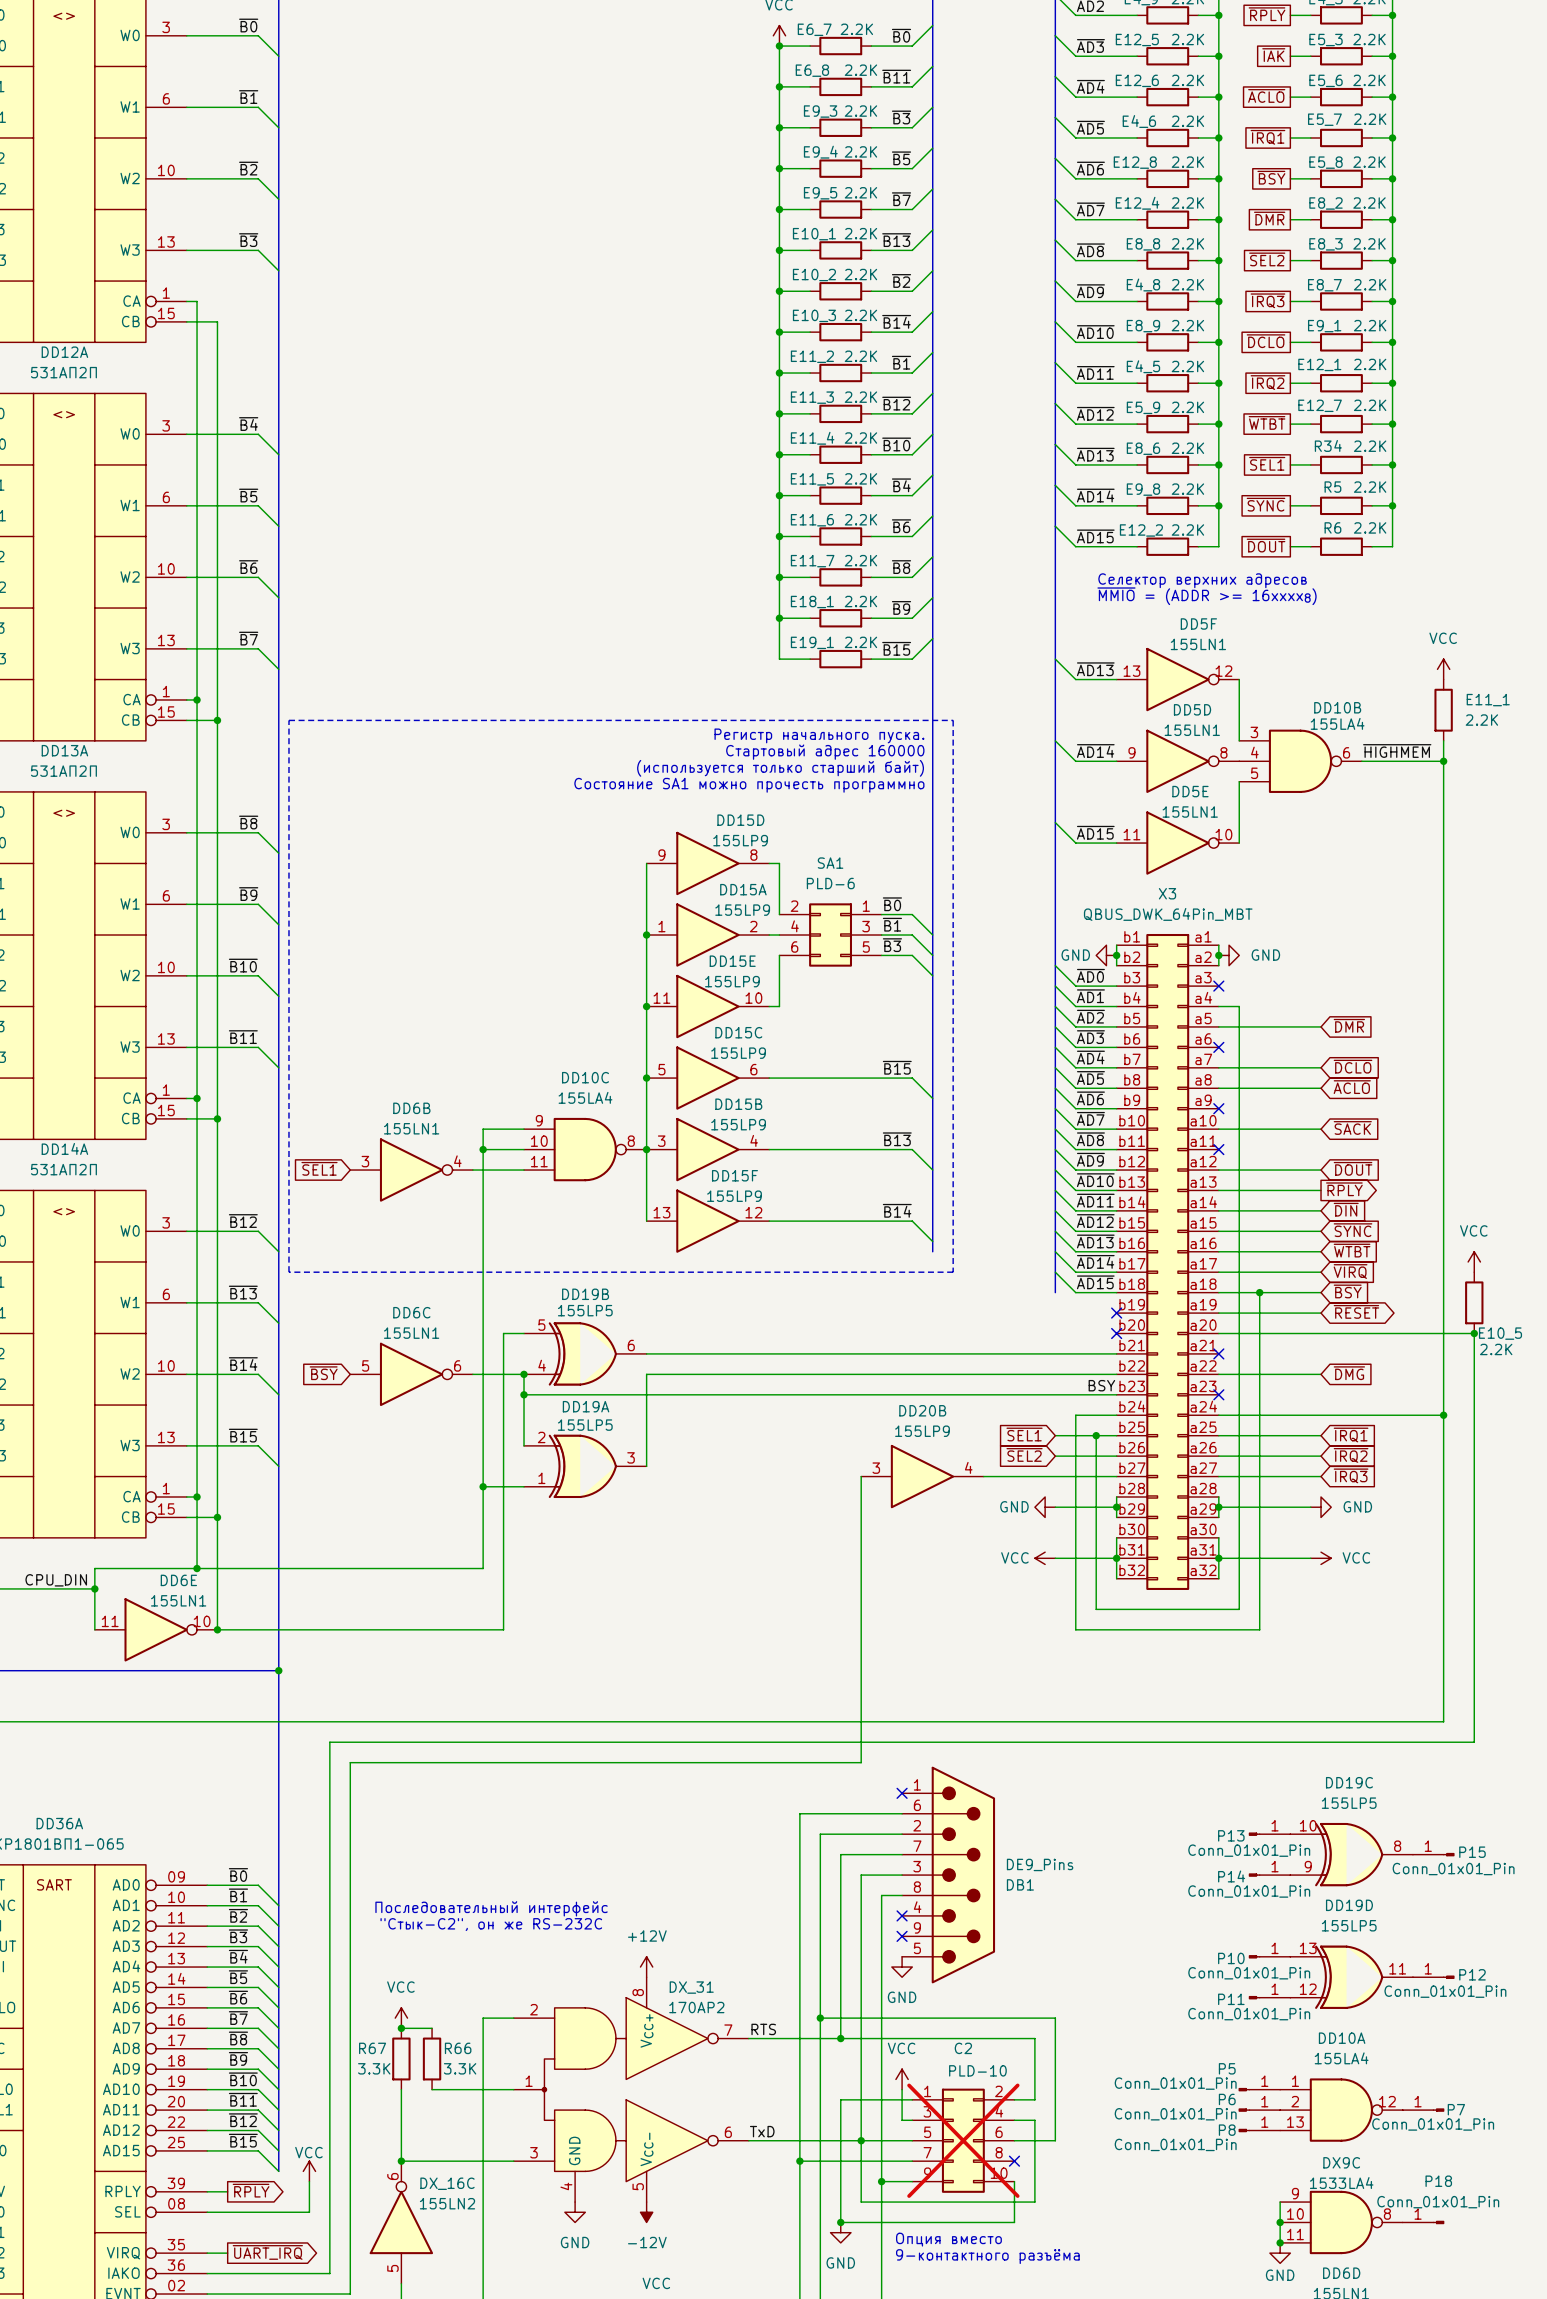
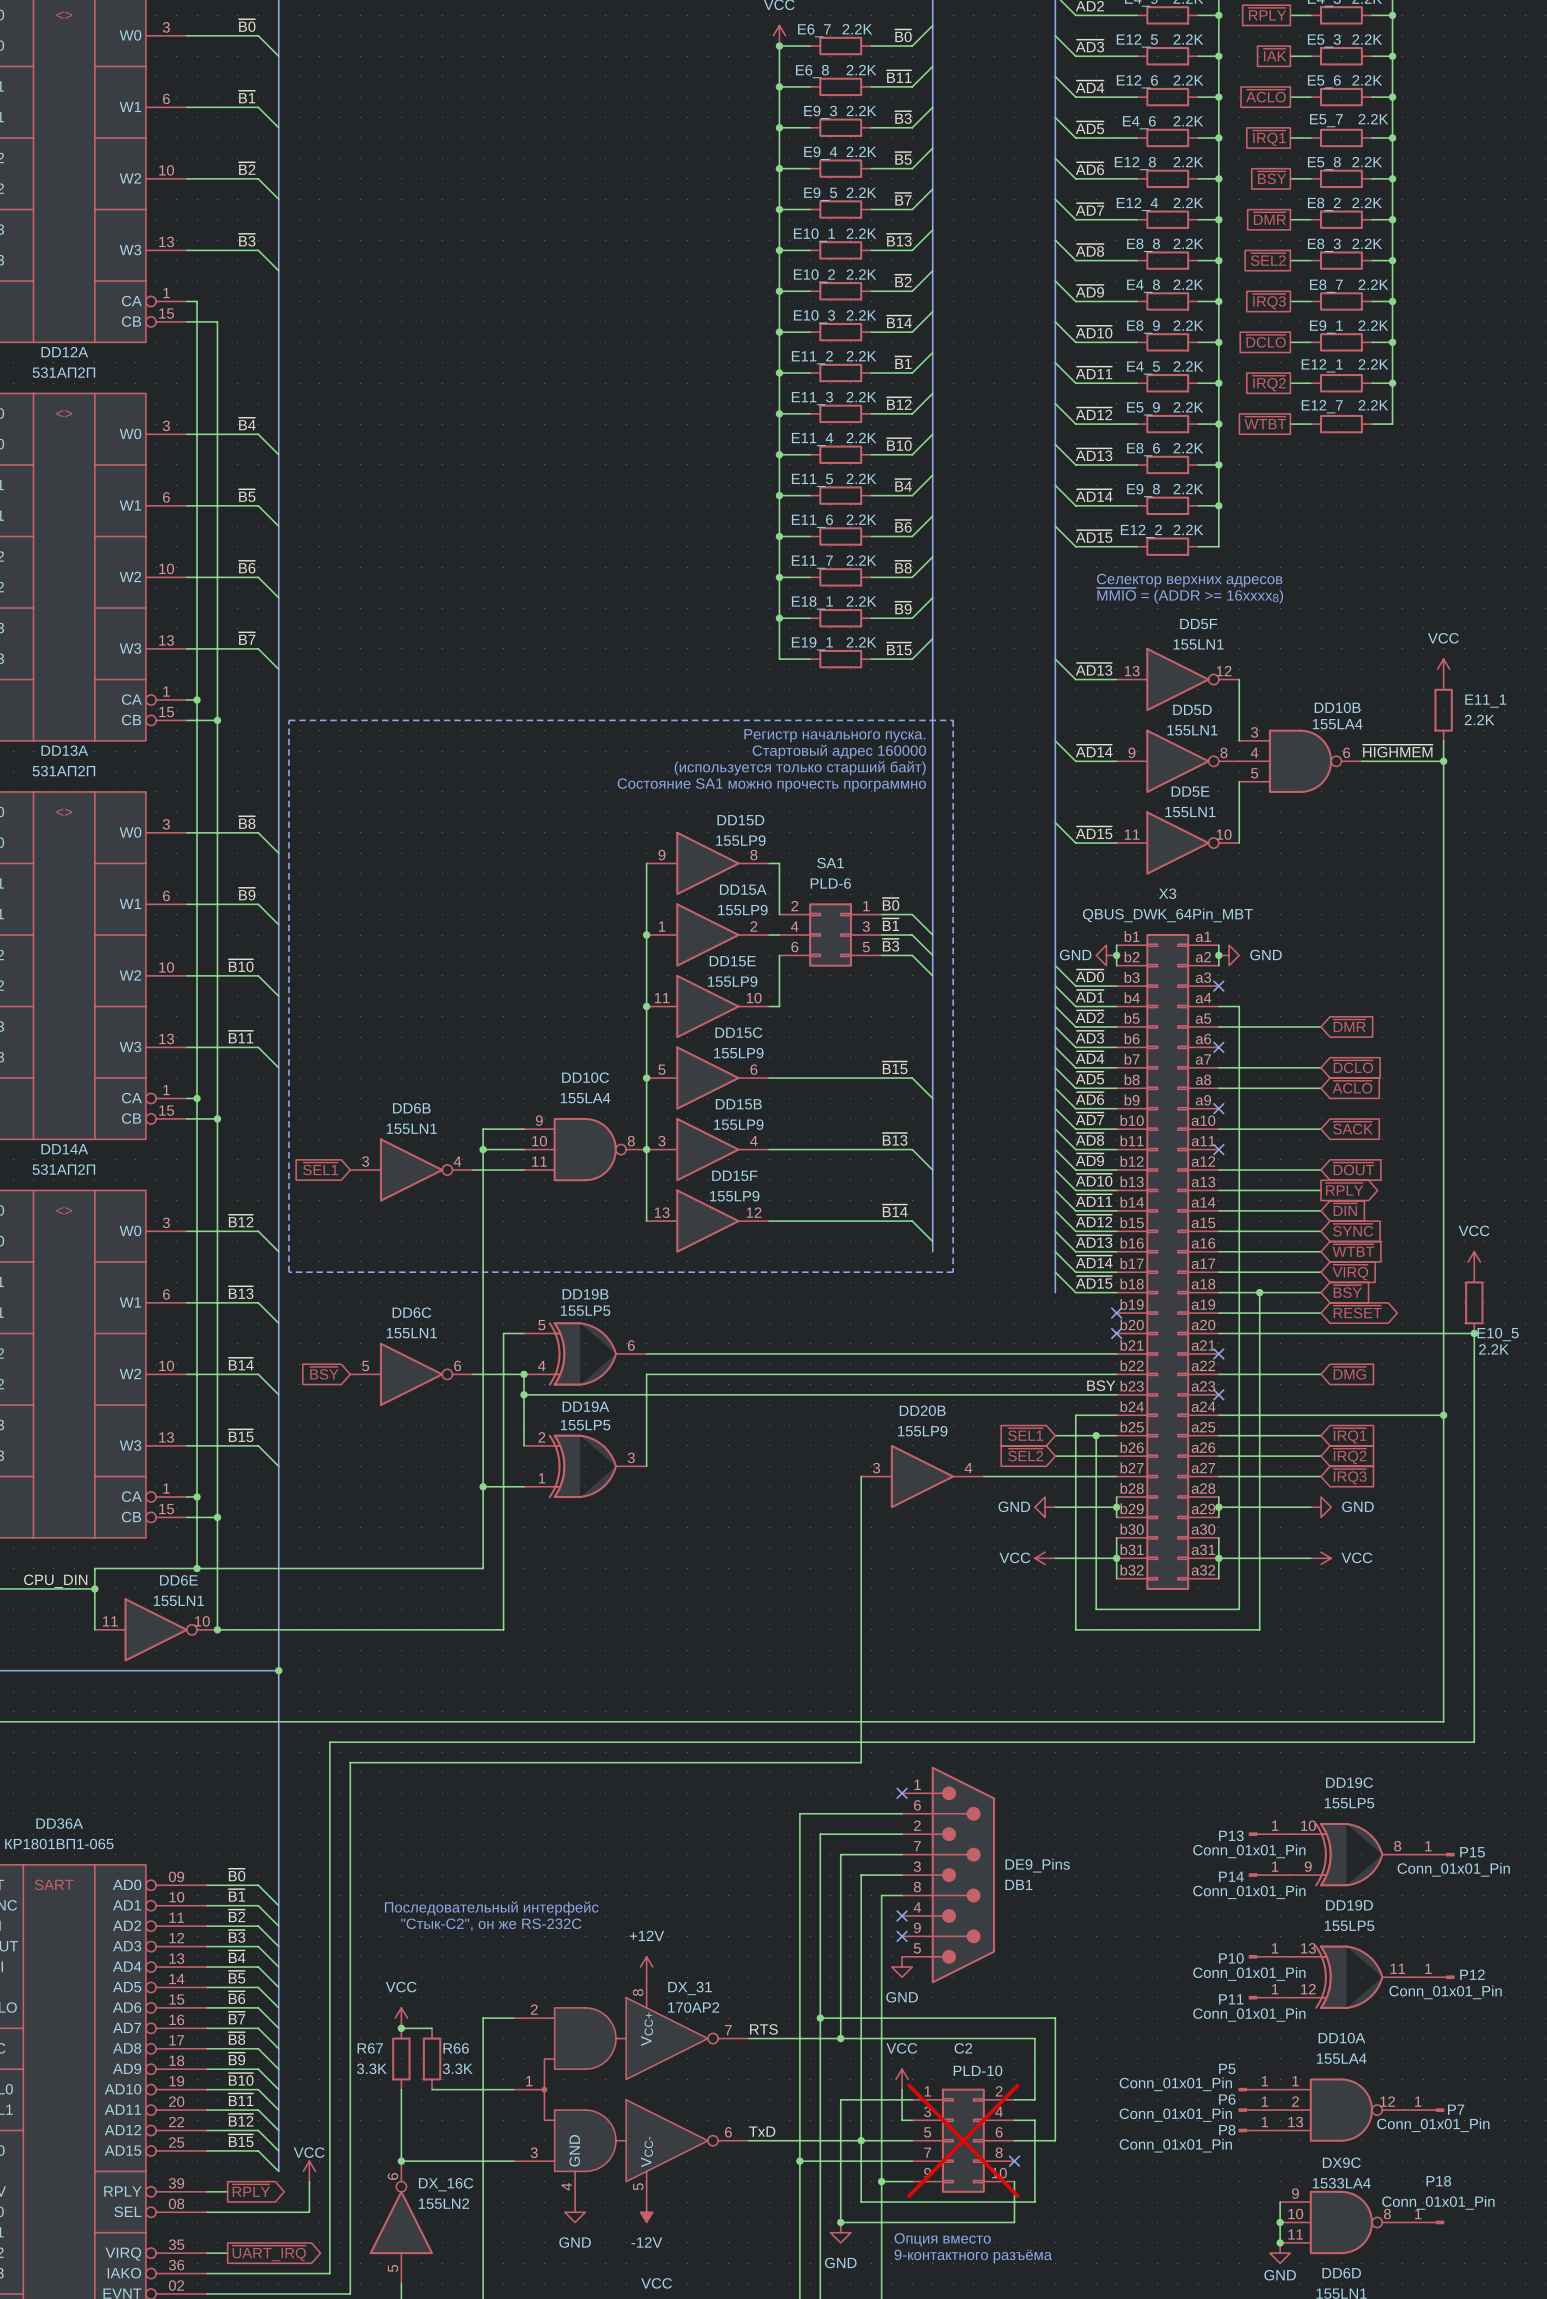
wire: (1392, 424) (1392, 546) (1372, 546) -> none
junction: (1392, 424) -> none
global label: ~{SEL1} (1267, 463) -> none
wire: (1290, 464) (1310, 464) -> none
R34: 2.2K (1341, 464) -> none
wire: (1372, 464) (1392, 464) -> none
junction: (1392, 464) -> none
global label: ~{SYNC} (1266, 504) -> none
wire: (1290, 505) (1310, 505) -> none
R5: 2.2K (1341, 505) -> none
wire: (1372, 505) (1392, 505) -> none
junction: (1392, 505) -> none
global label: ~{DOUT} (1266, 545) -> none
wire: (1290, 546) (1310, 546) -> none
R6: 2.2K (1341, 546) -> none

